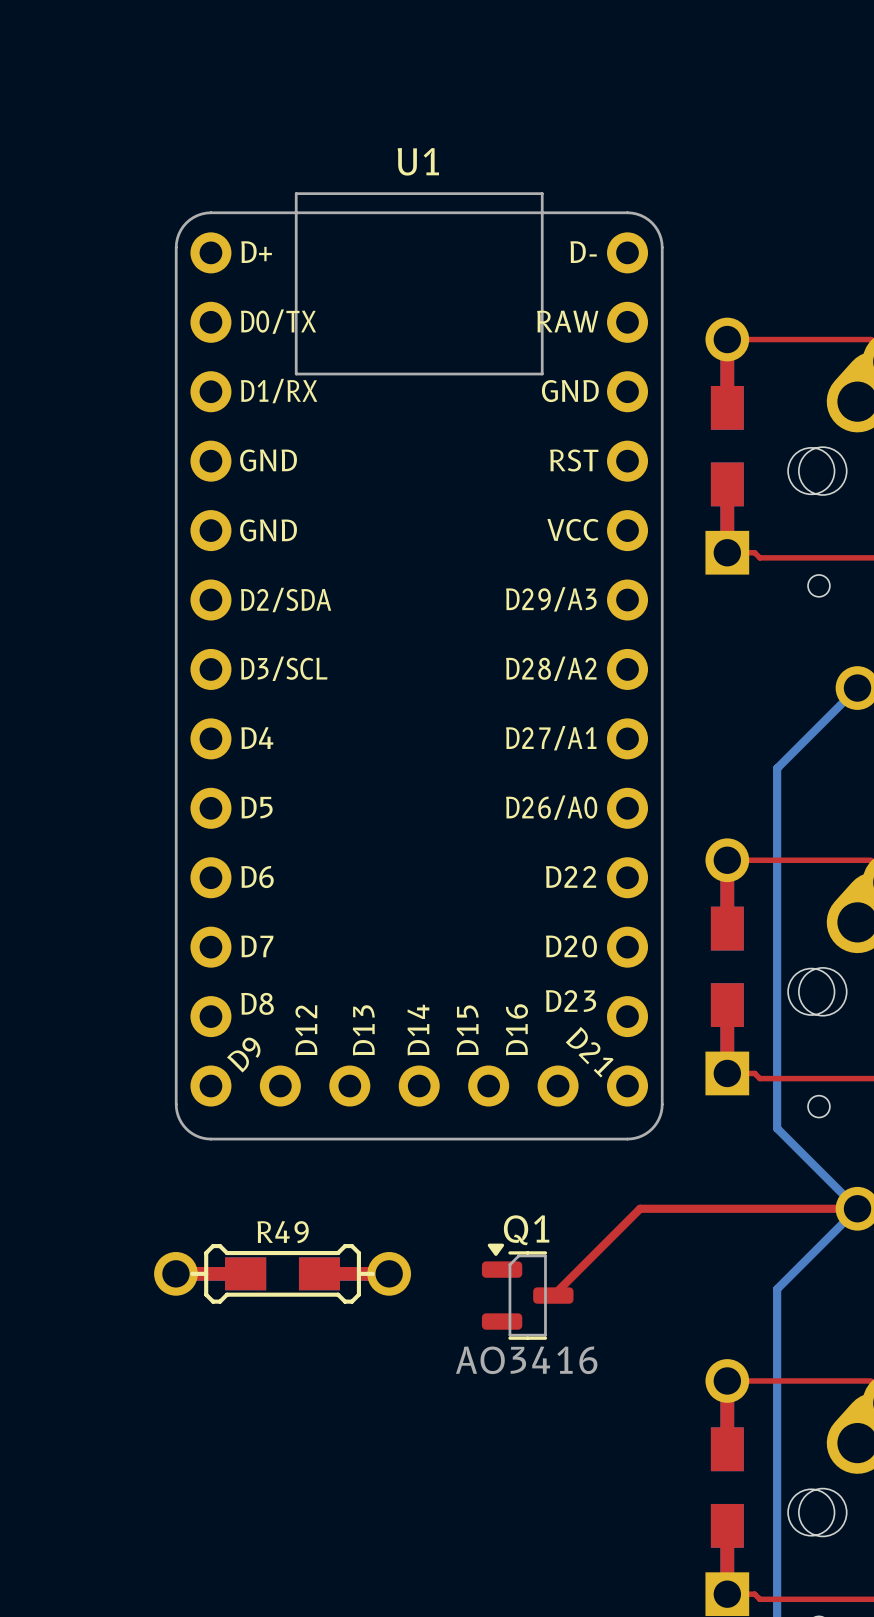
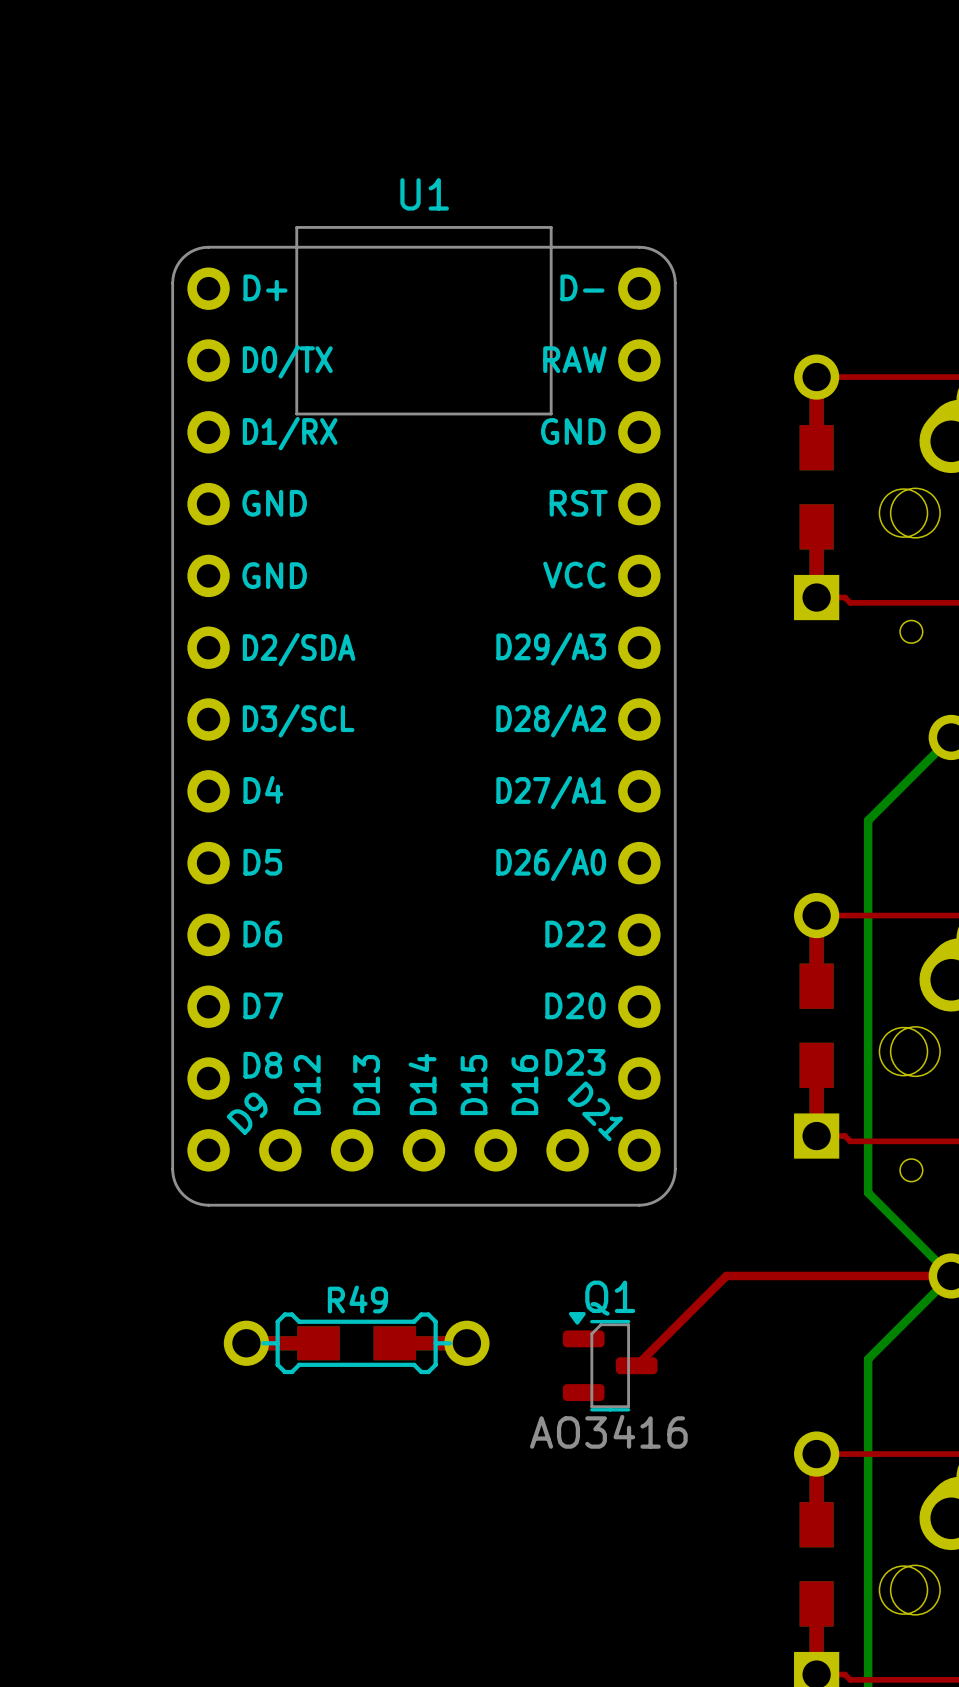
U1 position: (419, 666) -> (423, 716)

